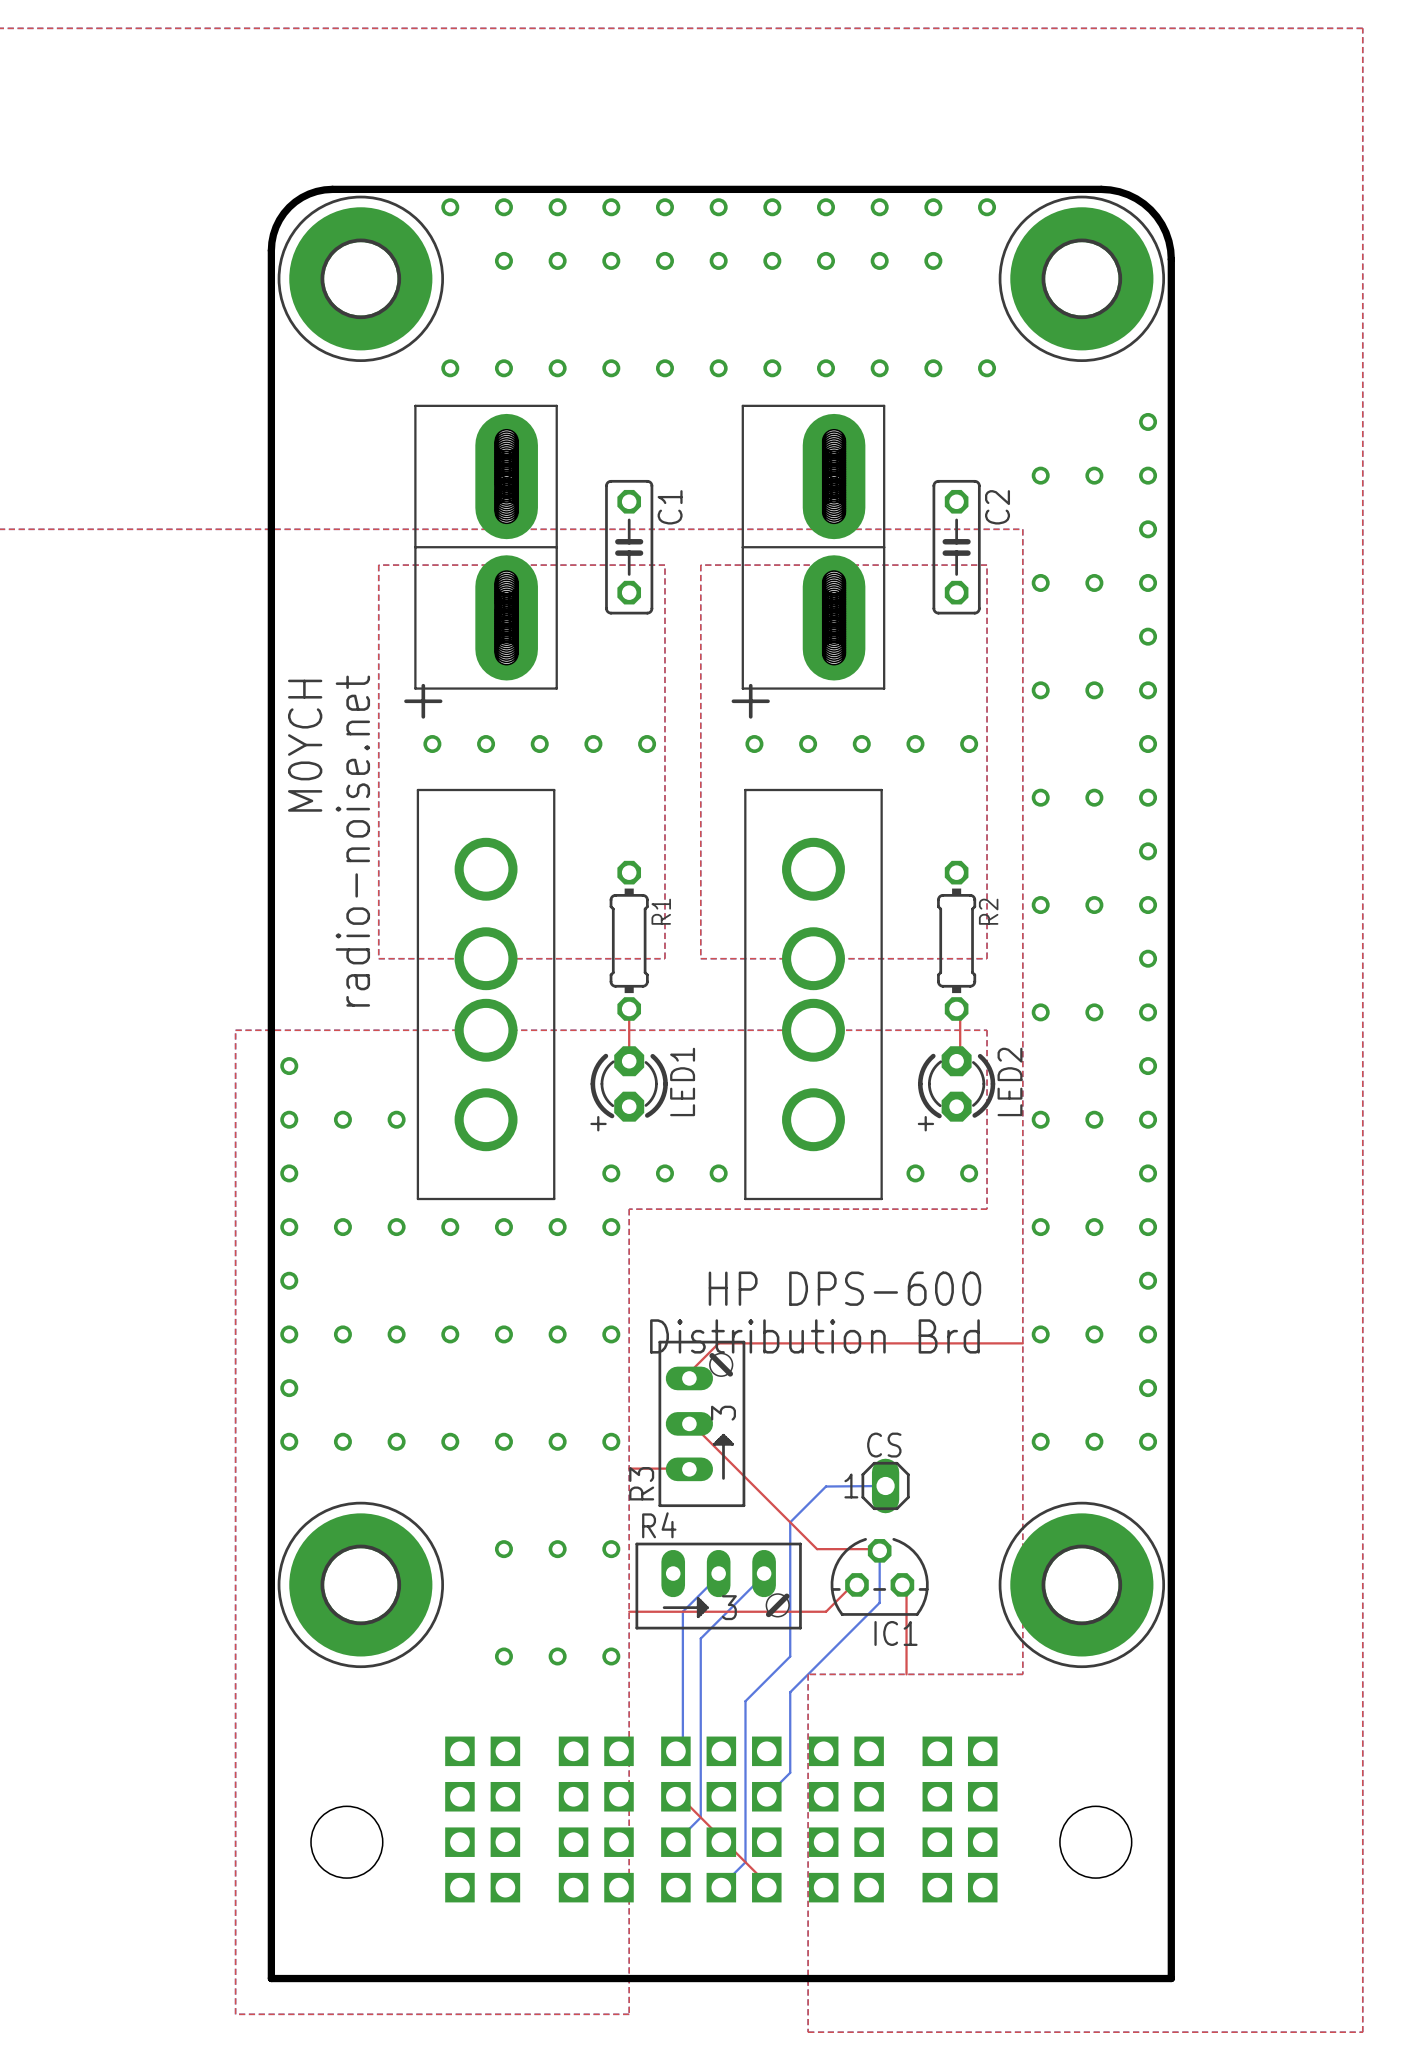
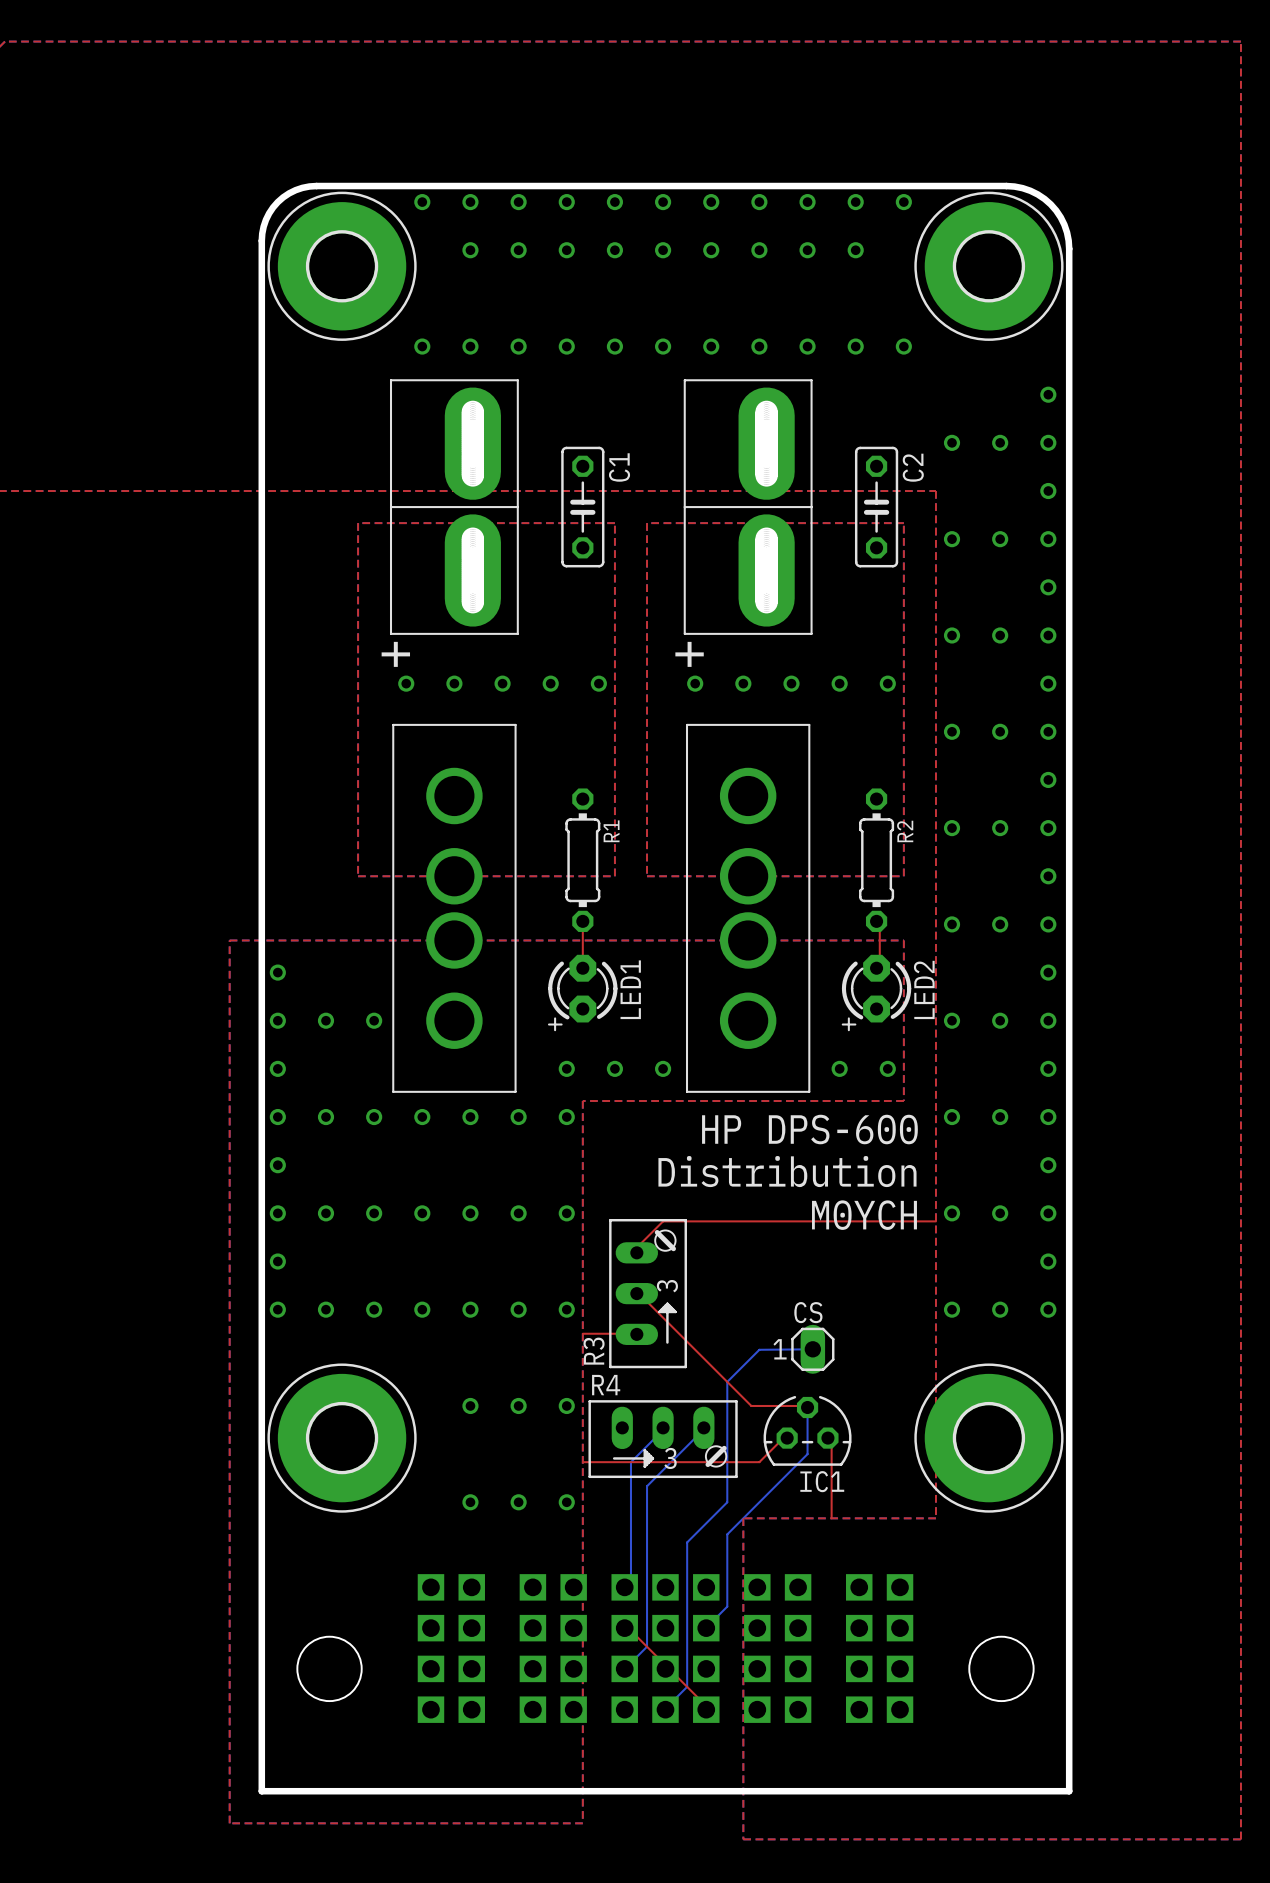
text: M0YCH (305, 745) -> none
text: radio-noise.net (352, 841) -> none
text position: HP DPS-600 (844, 1288) -> HP DPS-600 (809, 1129)
text: none -> Distribution (787, 1171)
text: Distribution Brd (814, 1336) -> M0YCH (864, 1215)

